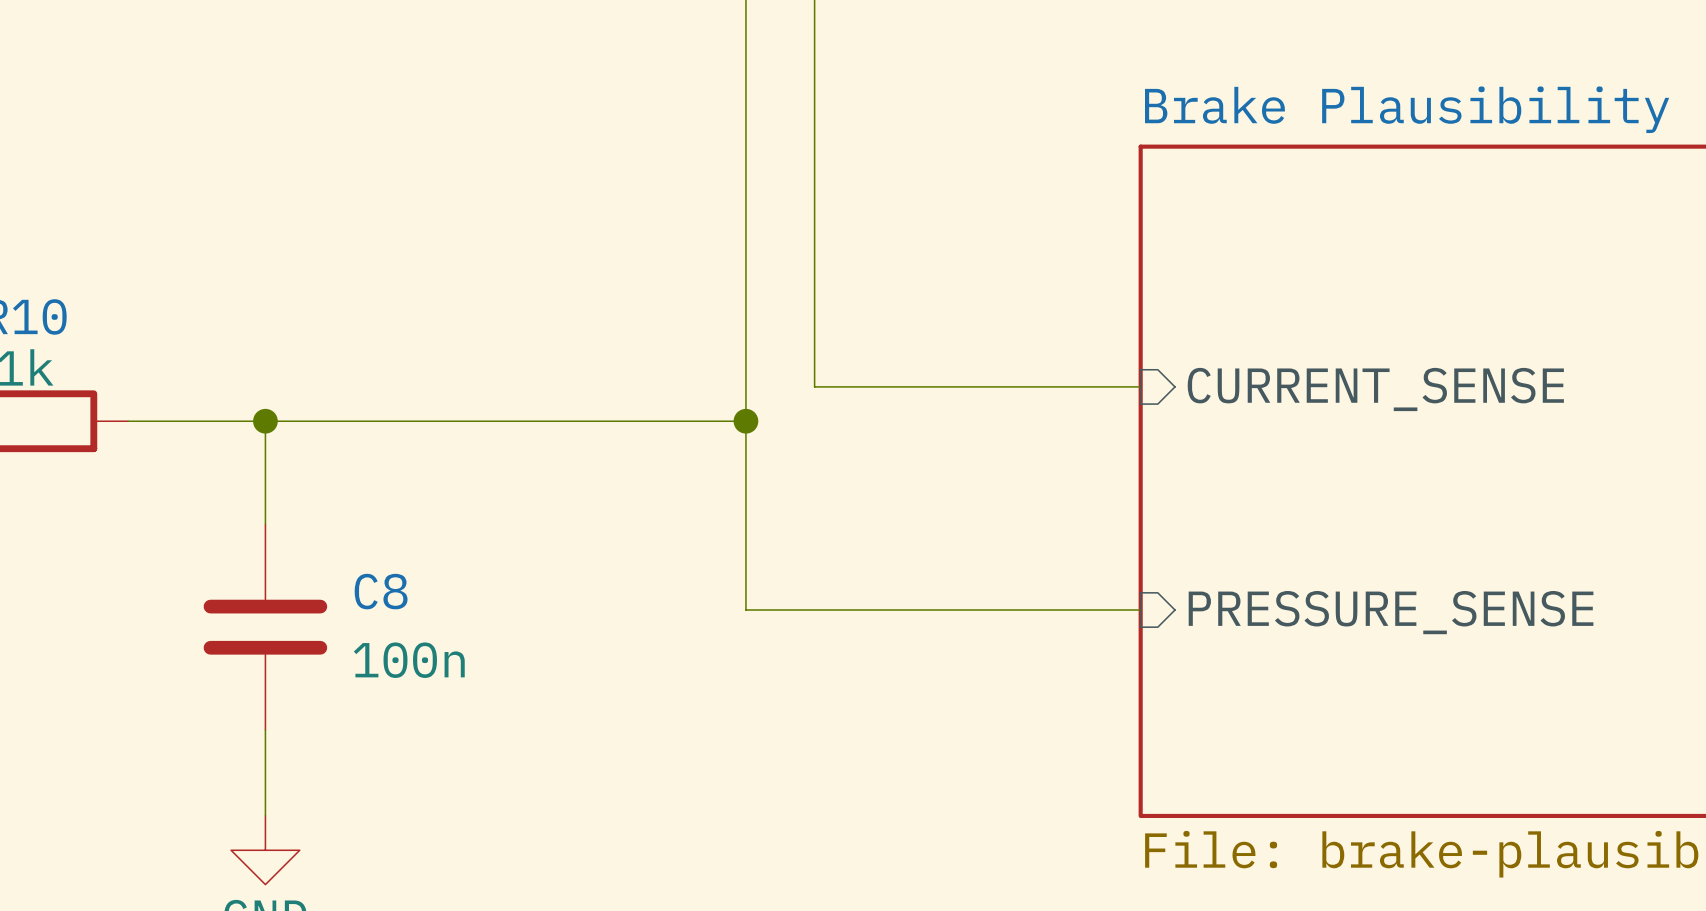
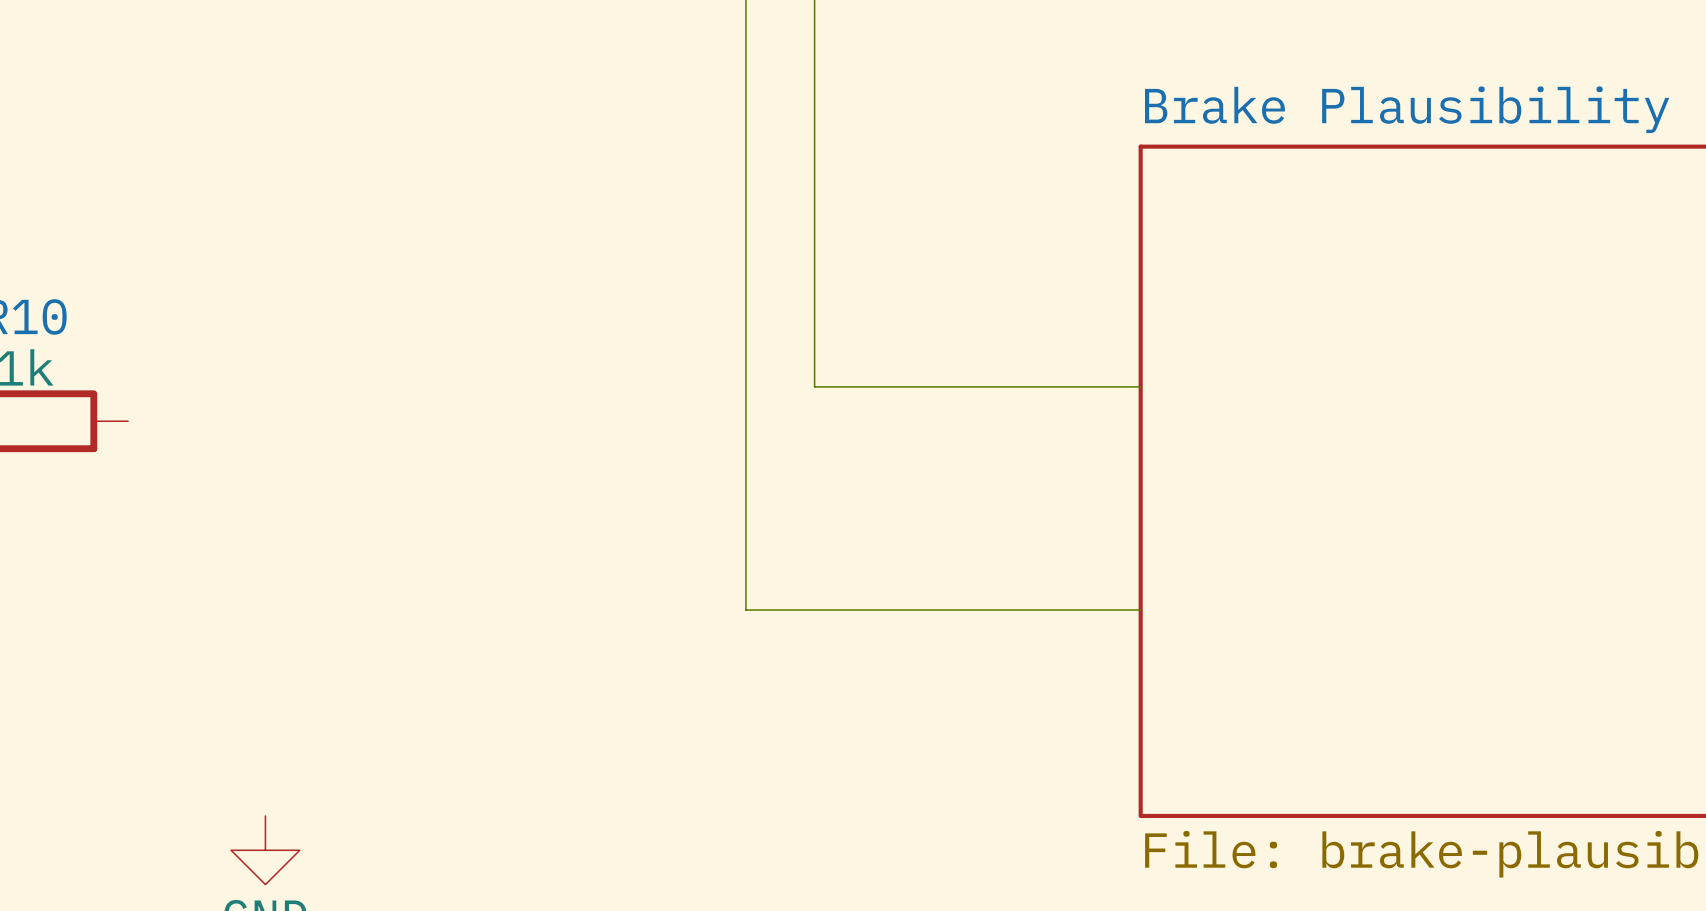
sheet pin: CURRENT_SENSE (1375, 389) -> none
wire: (128, 421) (745, 421) -> none
wire: (265, 421) (265, 524) -> none
junction: (265, 421) -> none
junction: (745, 421) -> none
sheet pin: PRESSURE_SENSE (1391, 612) -> none
C8: 100n (265, 627) -> none
wire: (265, 730) (265, 815) -> none

